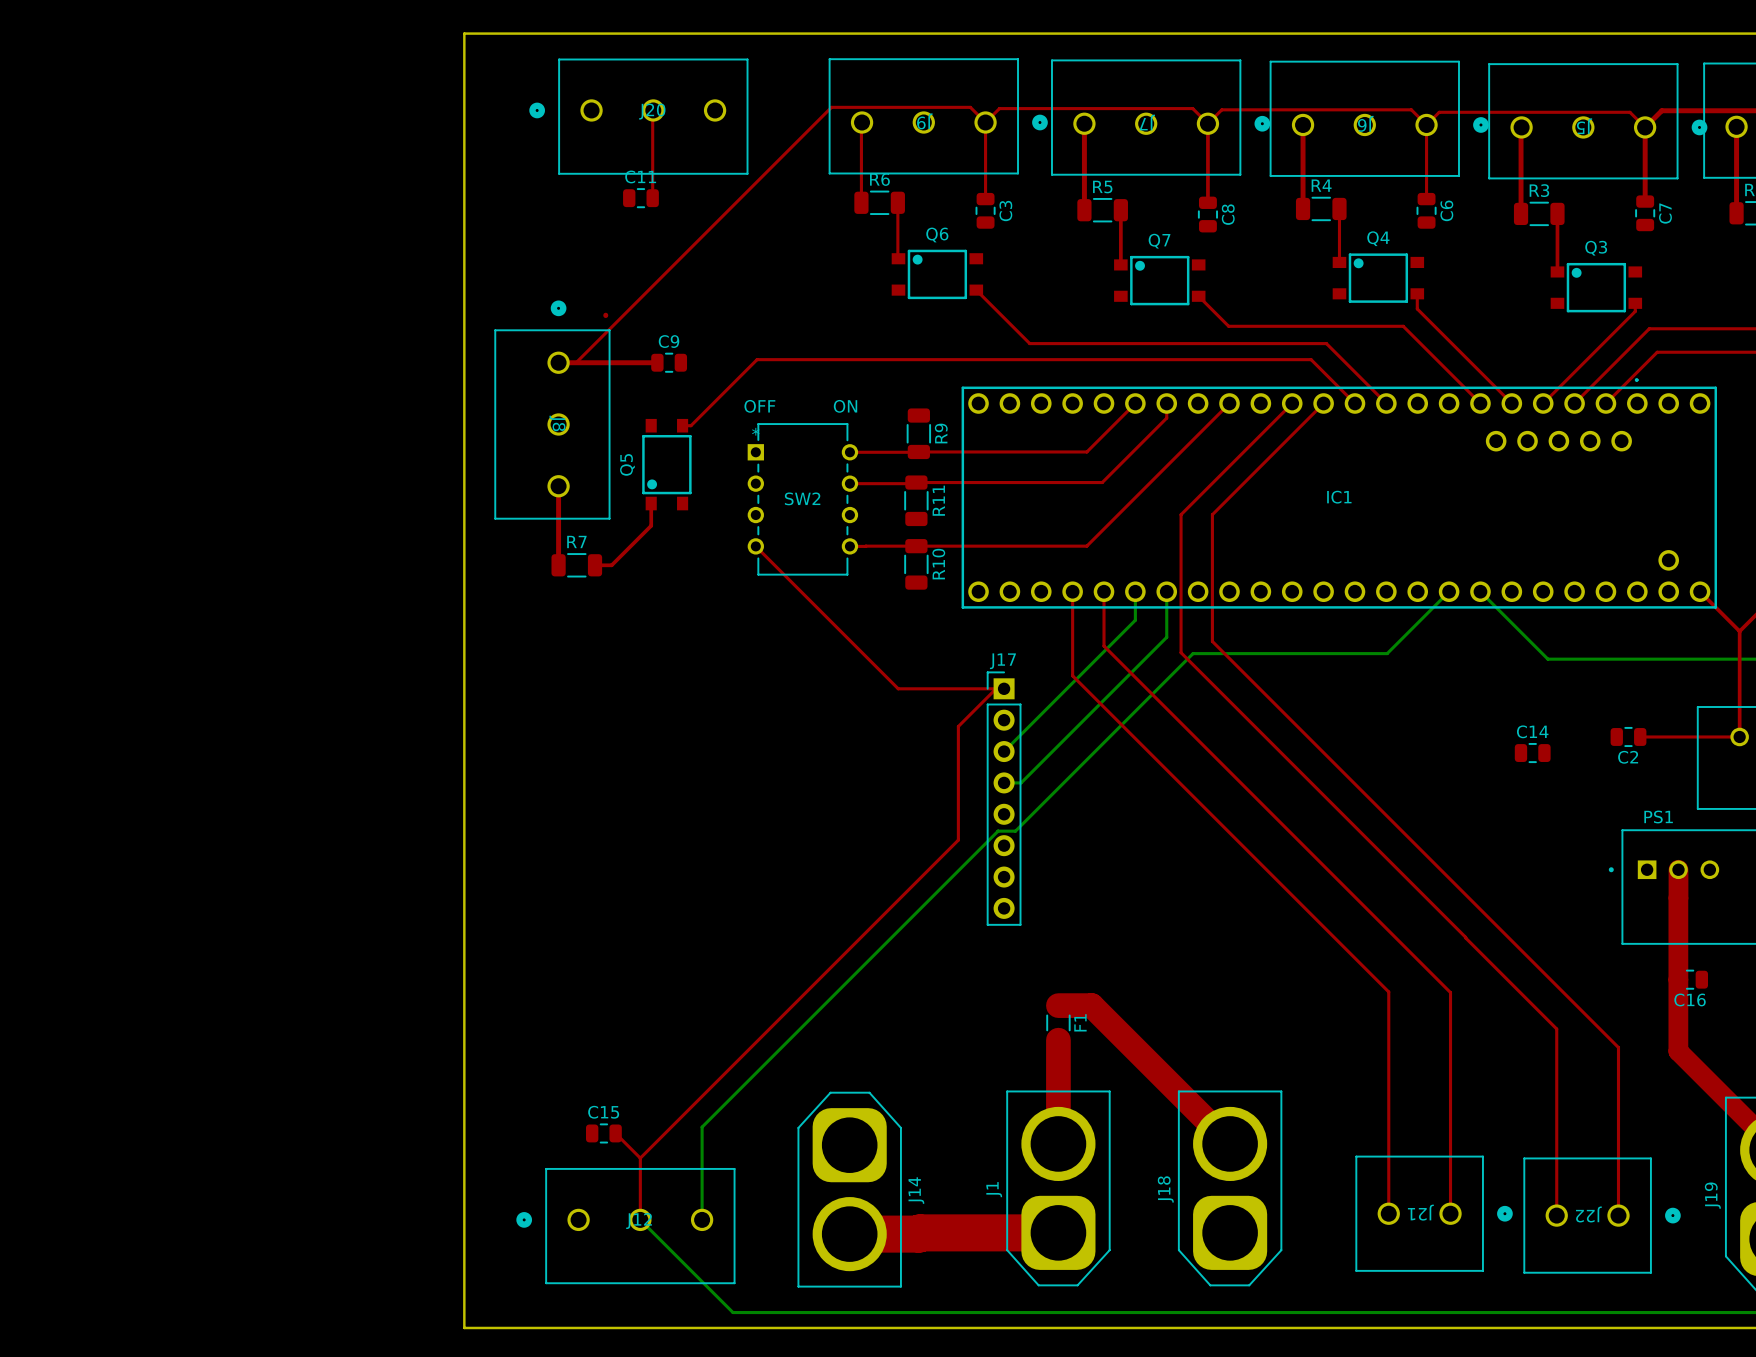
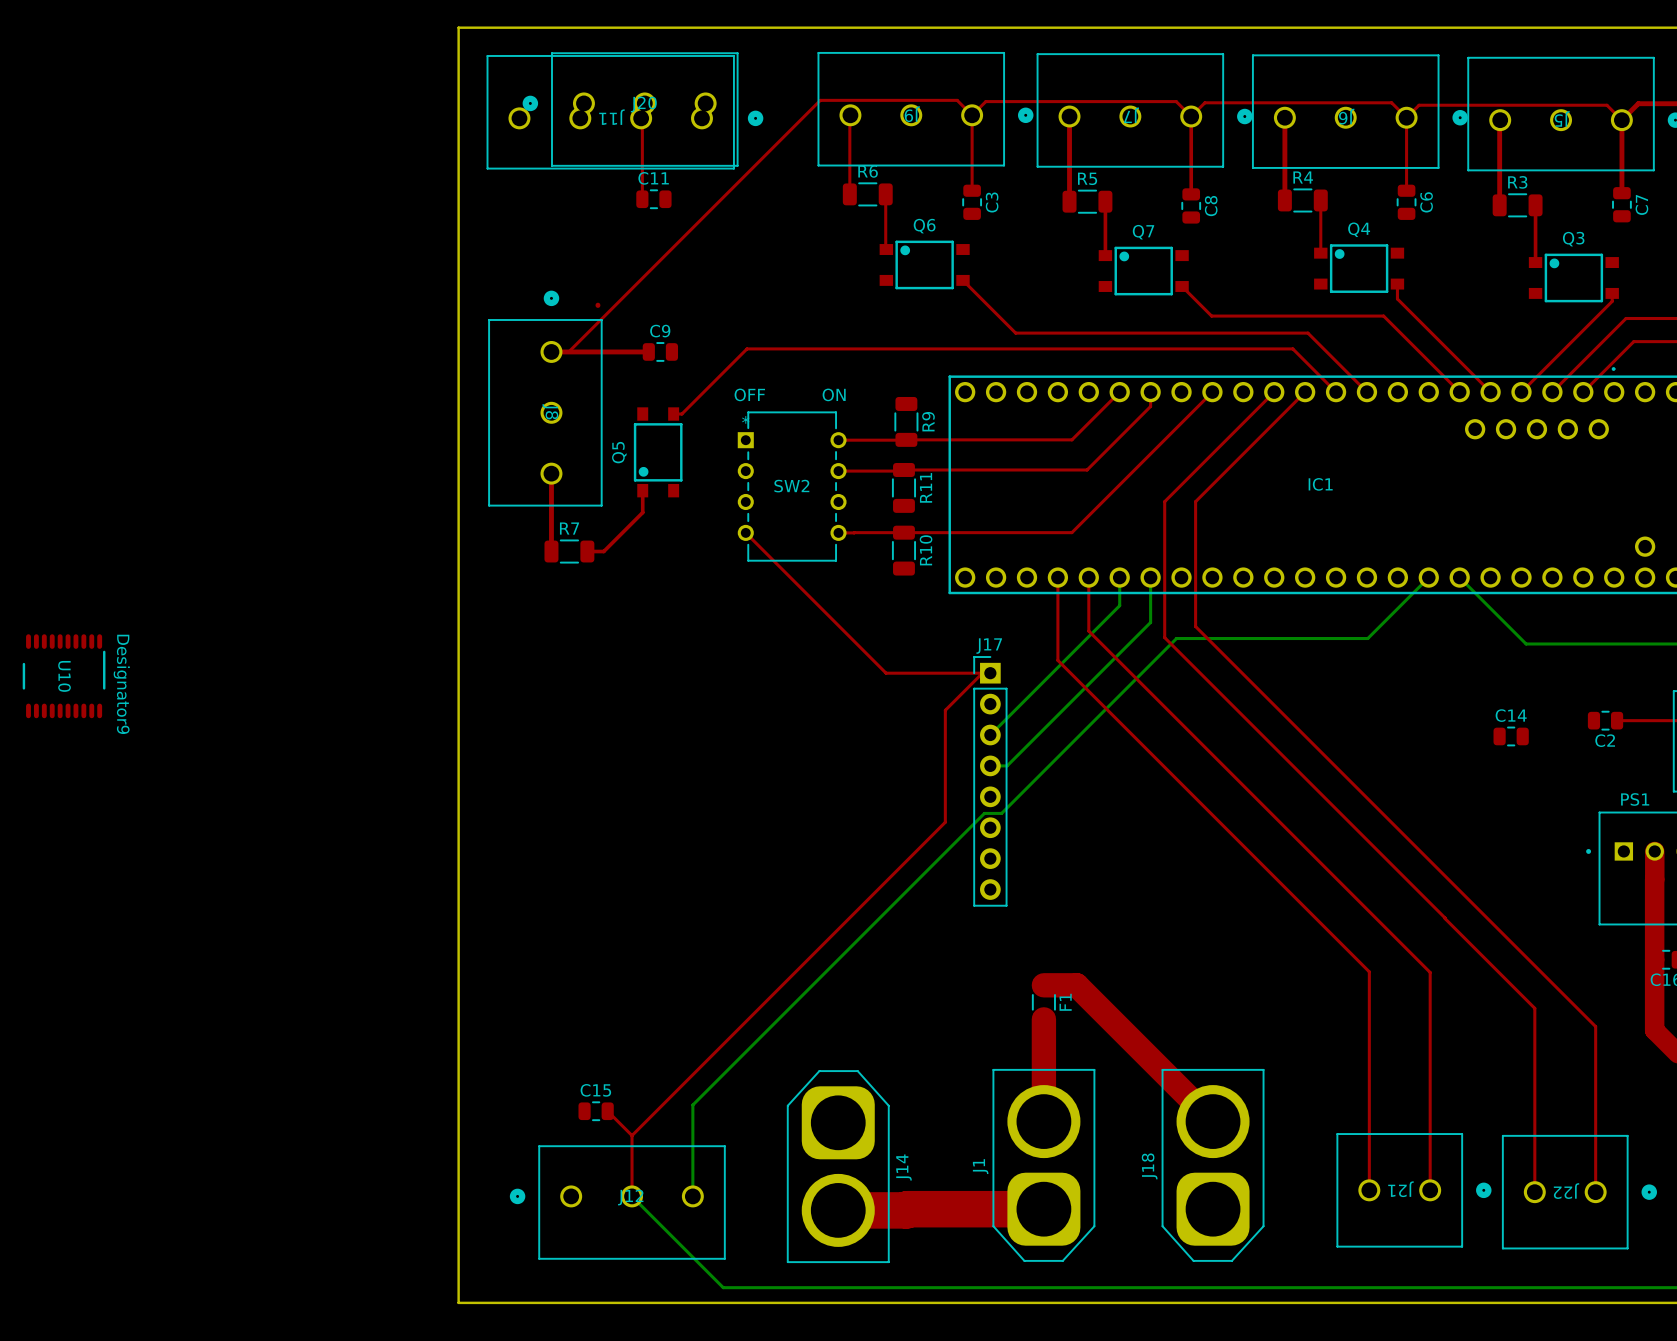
top track: (653, 110) (652, 198) -> none
J11: none -> (624, 112)
top track: none -> (641, 118) (642, 199)
C11 position: (640, 198) -> (653, 199)
U10: none -> (64, 676)

